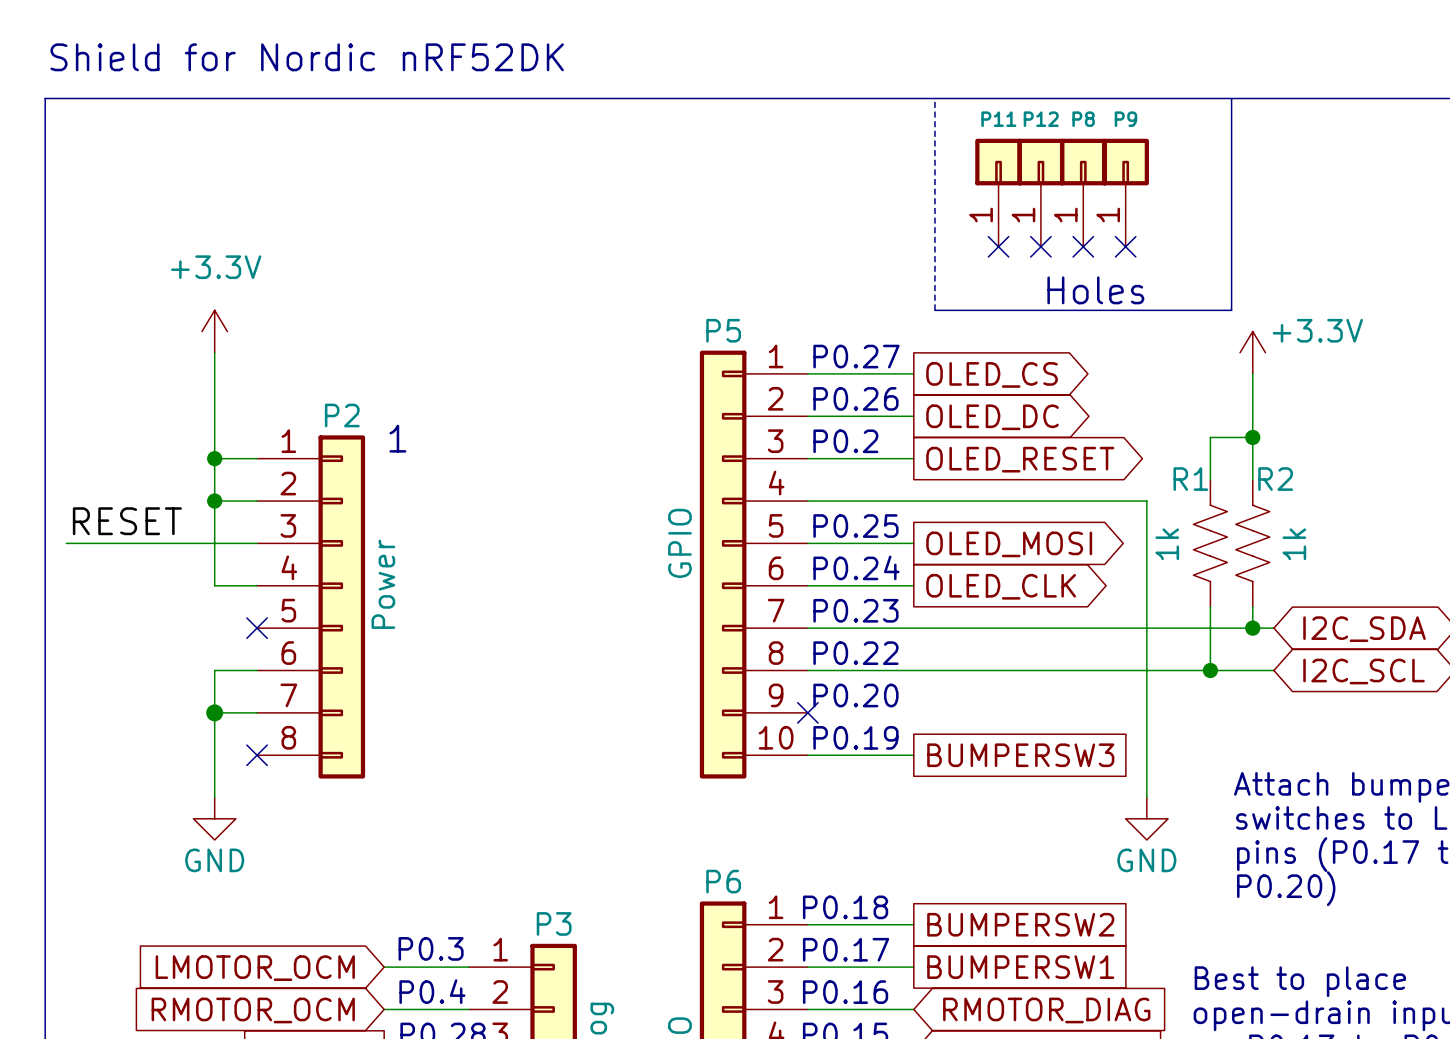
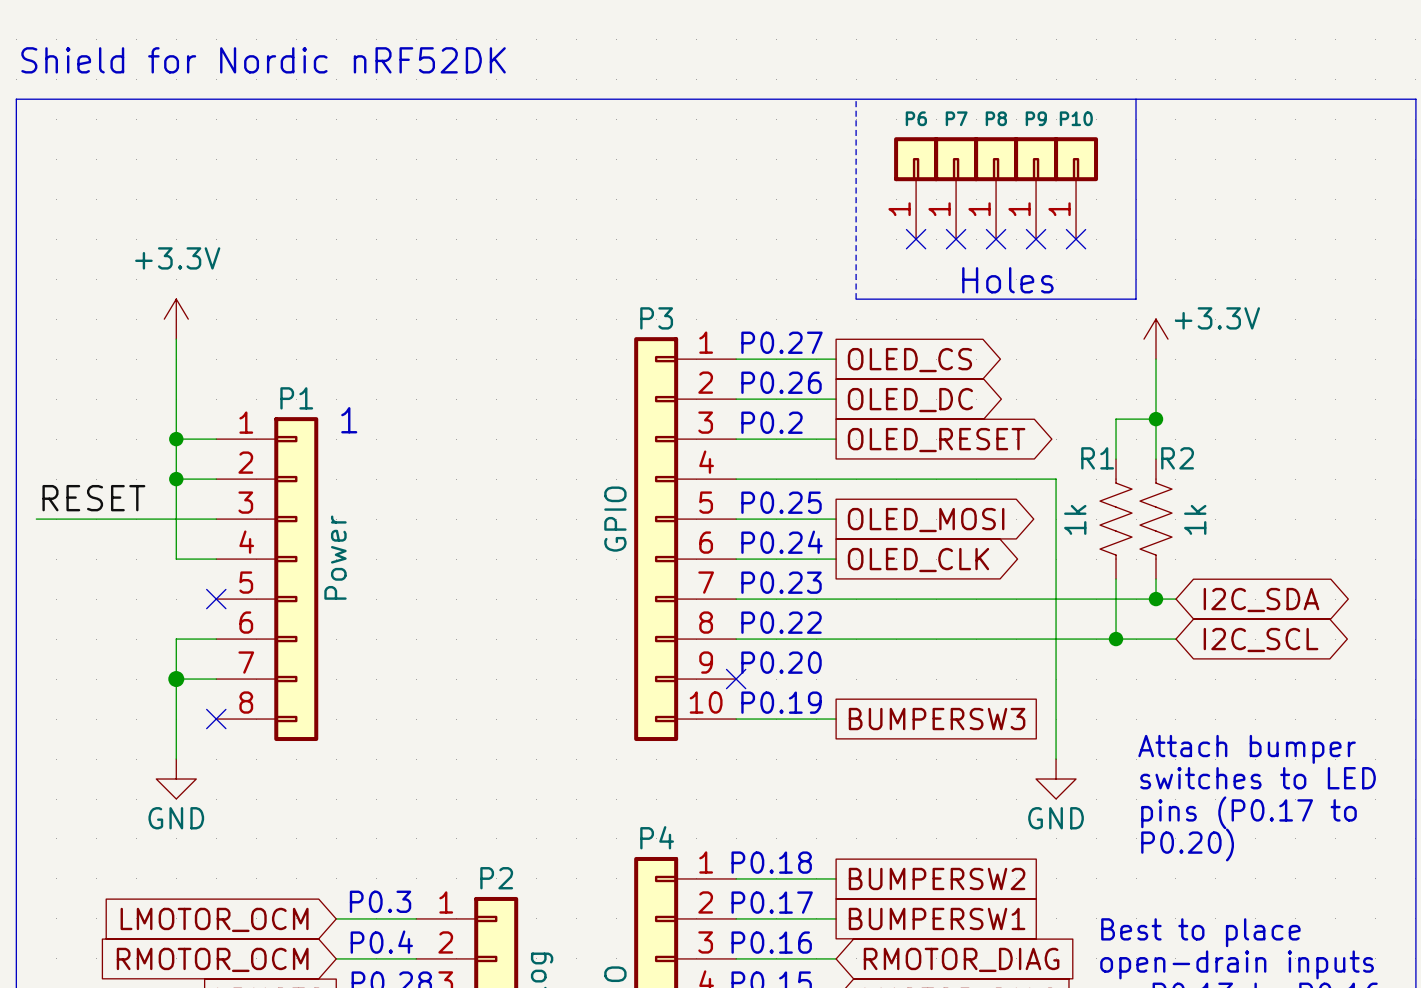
P11 name: P11 (998, 119) -> P6 (916, 118)
P12 name: P12 (1041, 119) -> P7 (956, 118)
P10: none -> (1076, 188)
no-connect mark: none -> (1076, 239)
P5 name: P5 (723, 330) -> P3 (656, 318)
P2 name: P2 (342, 415) -> P1 (296, 398)
P6 name: P6 (723, 881) -> P4 (657, 837)
P3 name: P3 (554, 923) -> P2 (496, 878)

